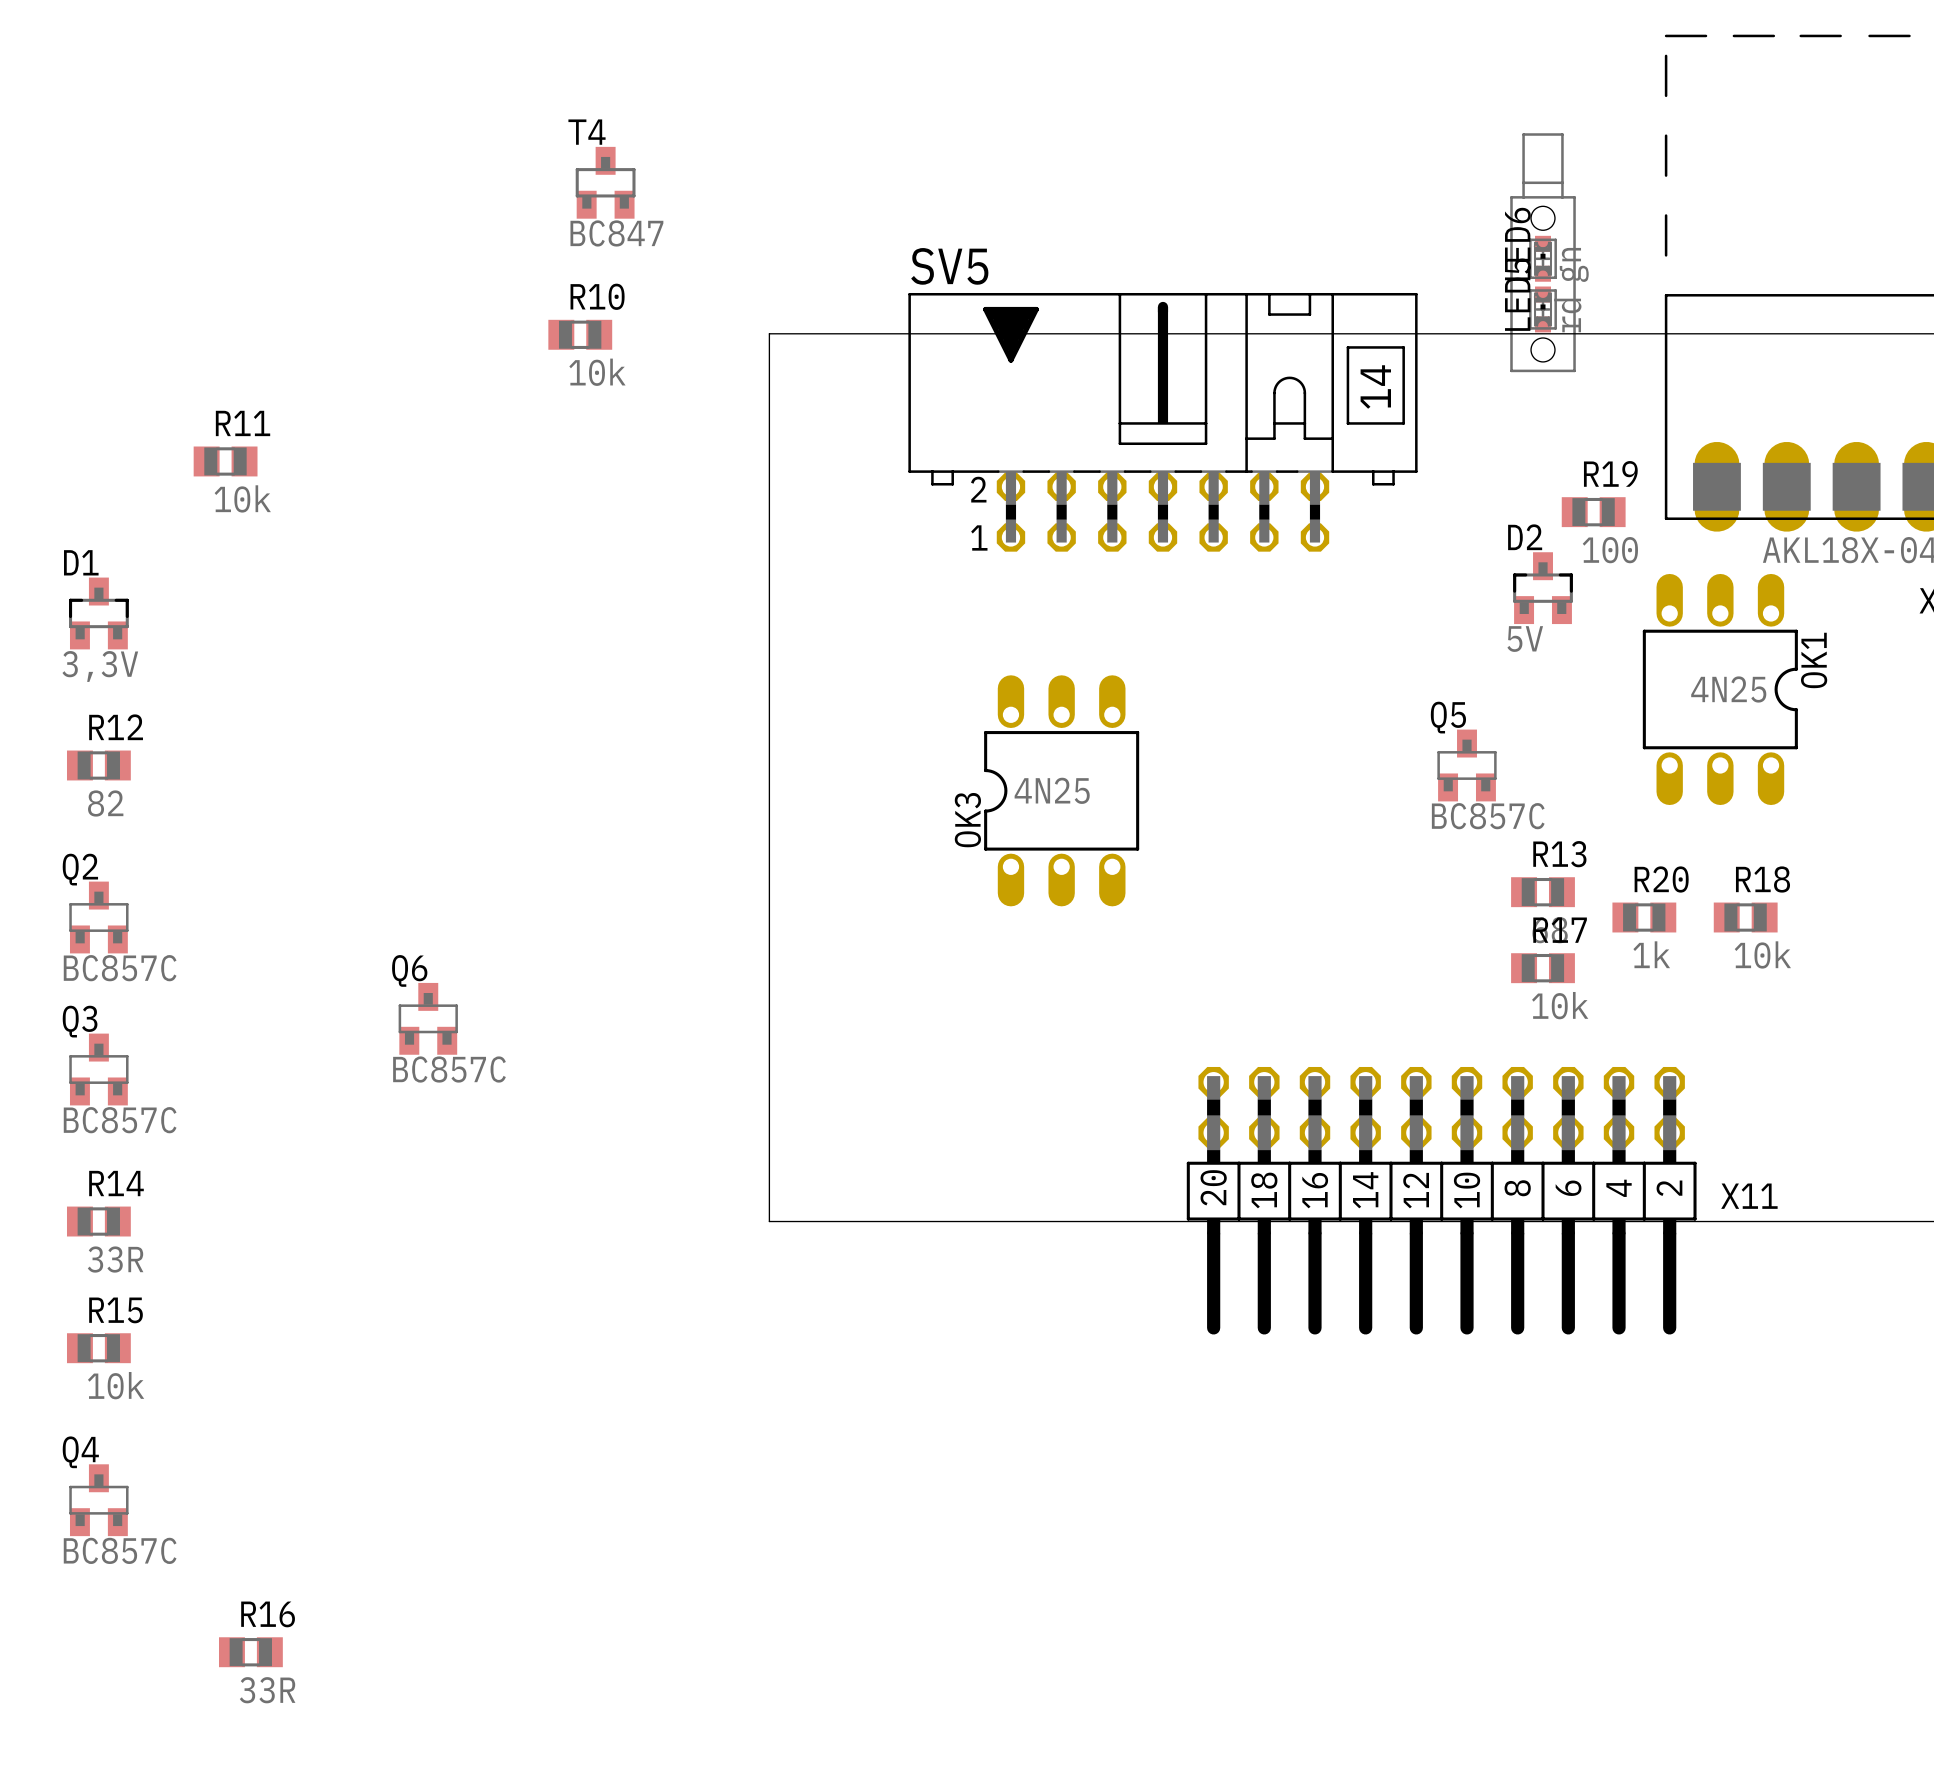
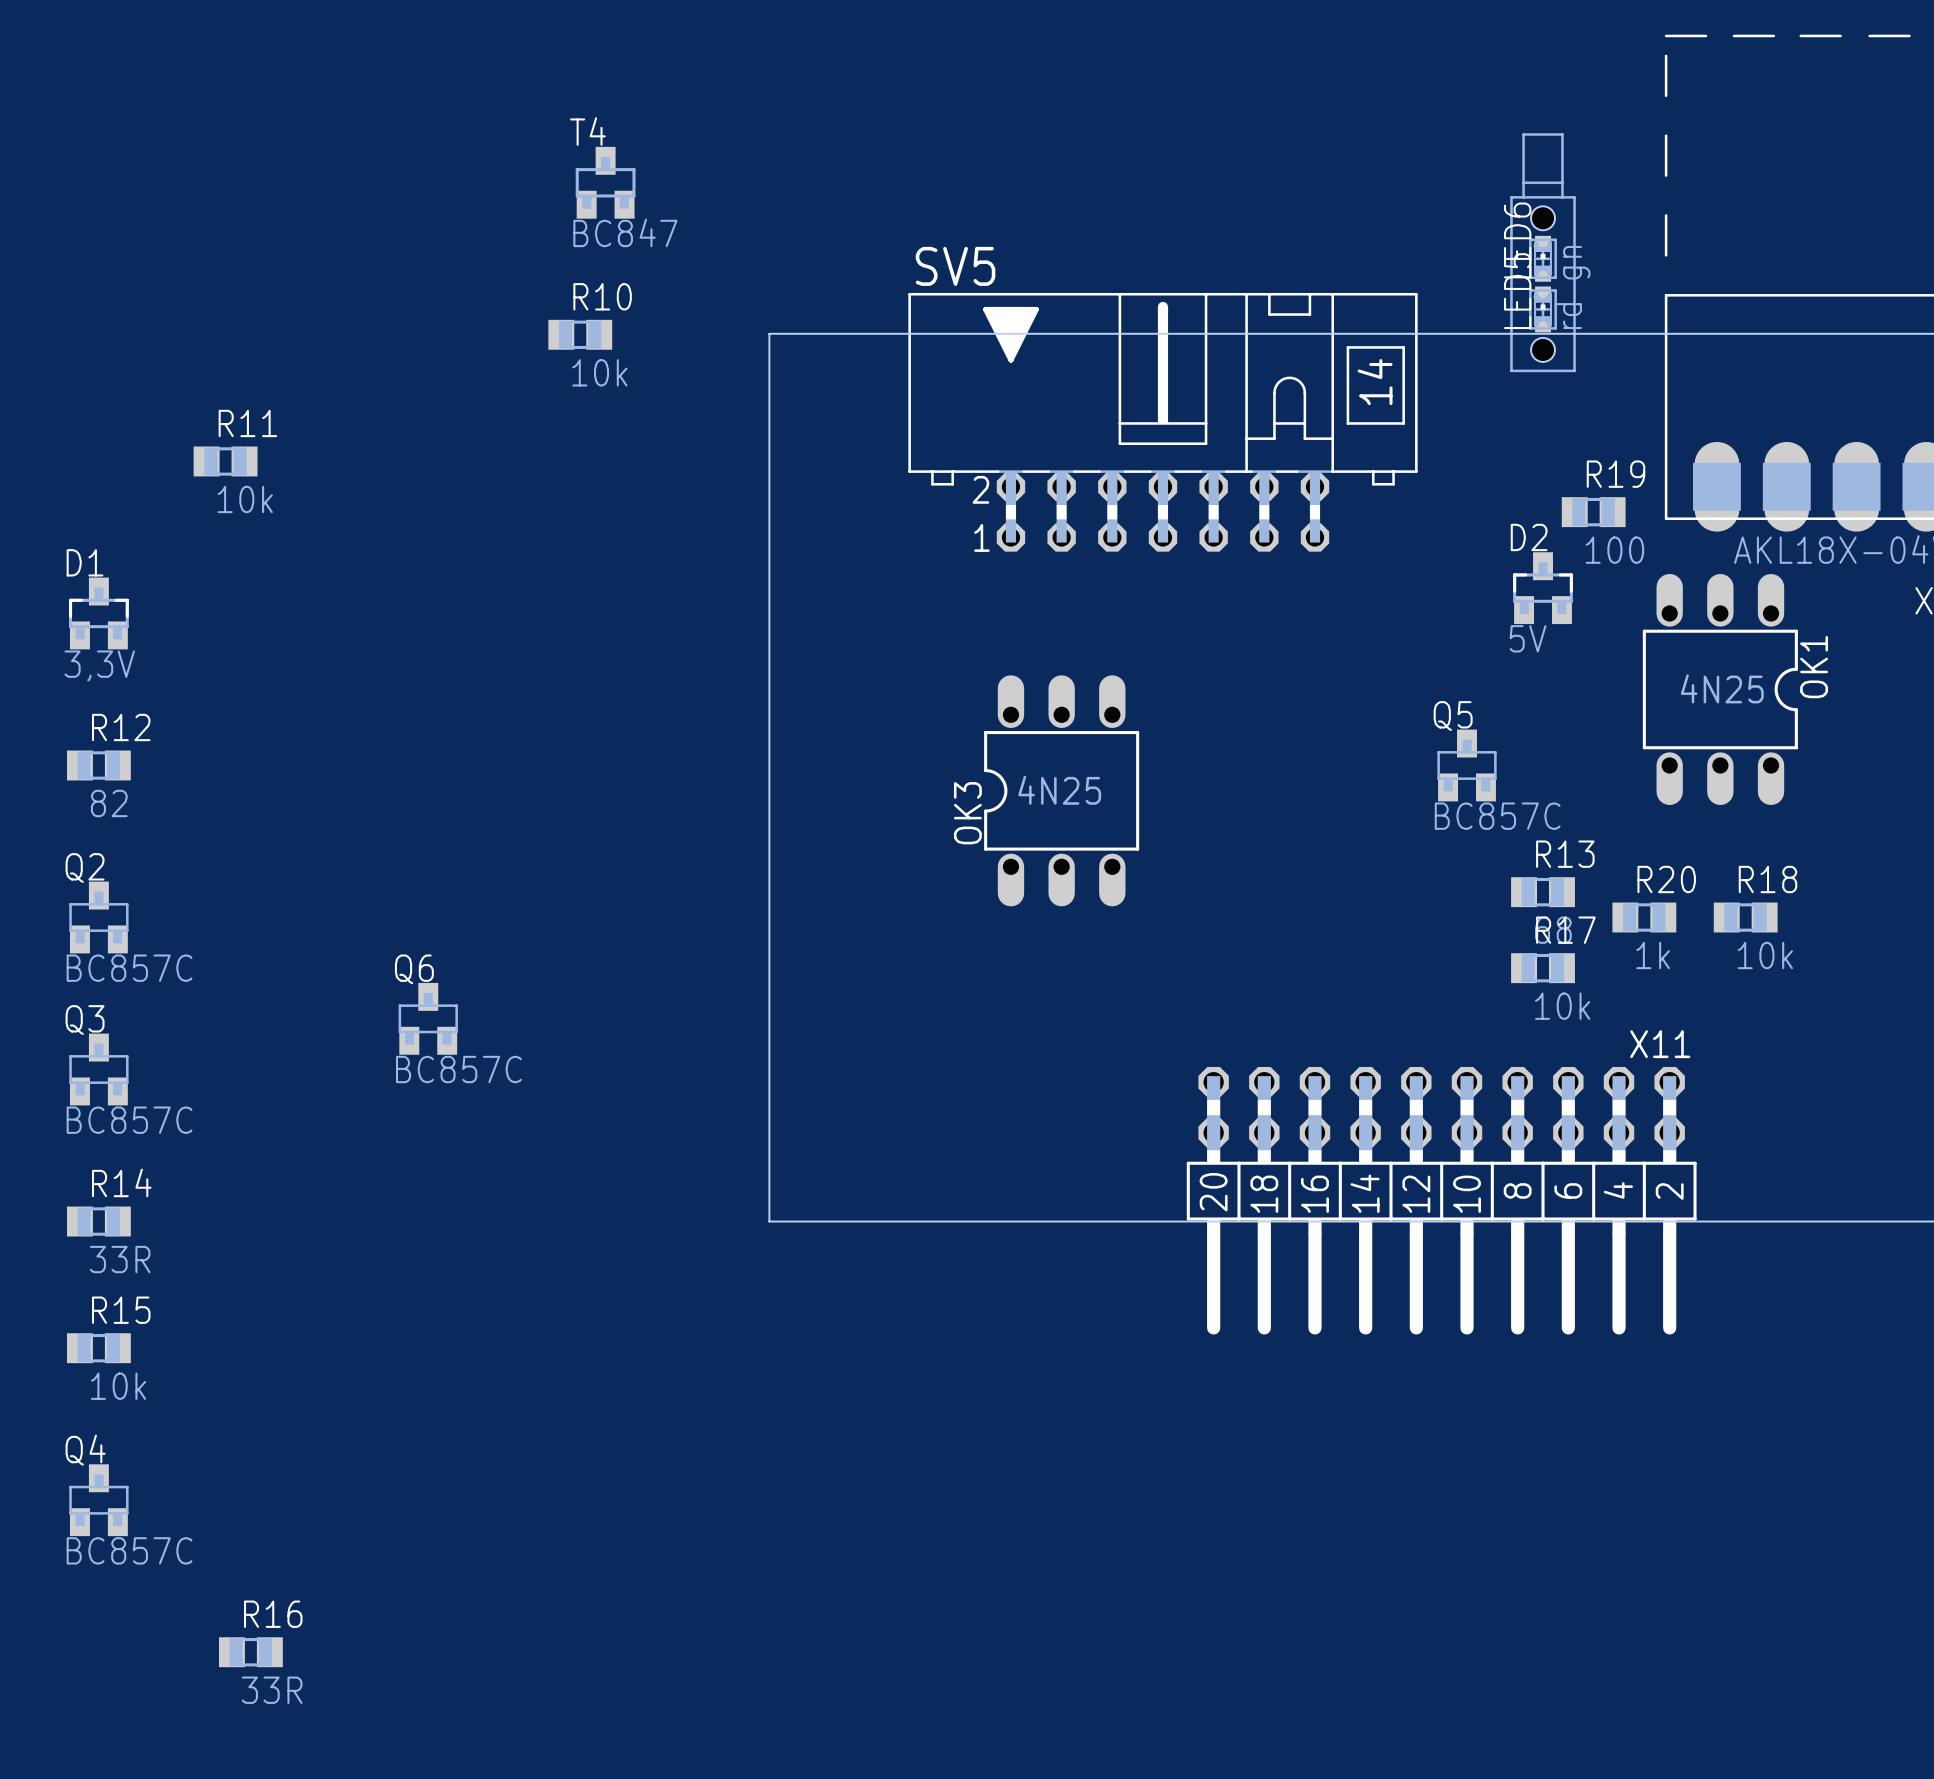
X11 name position: X11 (1749, 1196) -> X11 (1660, 1044)

